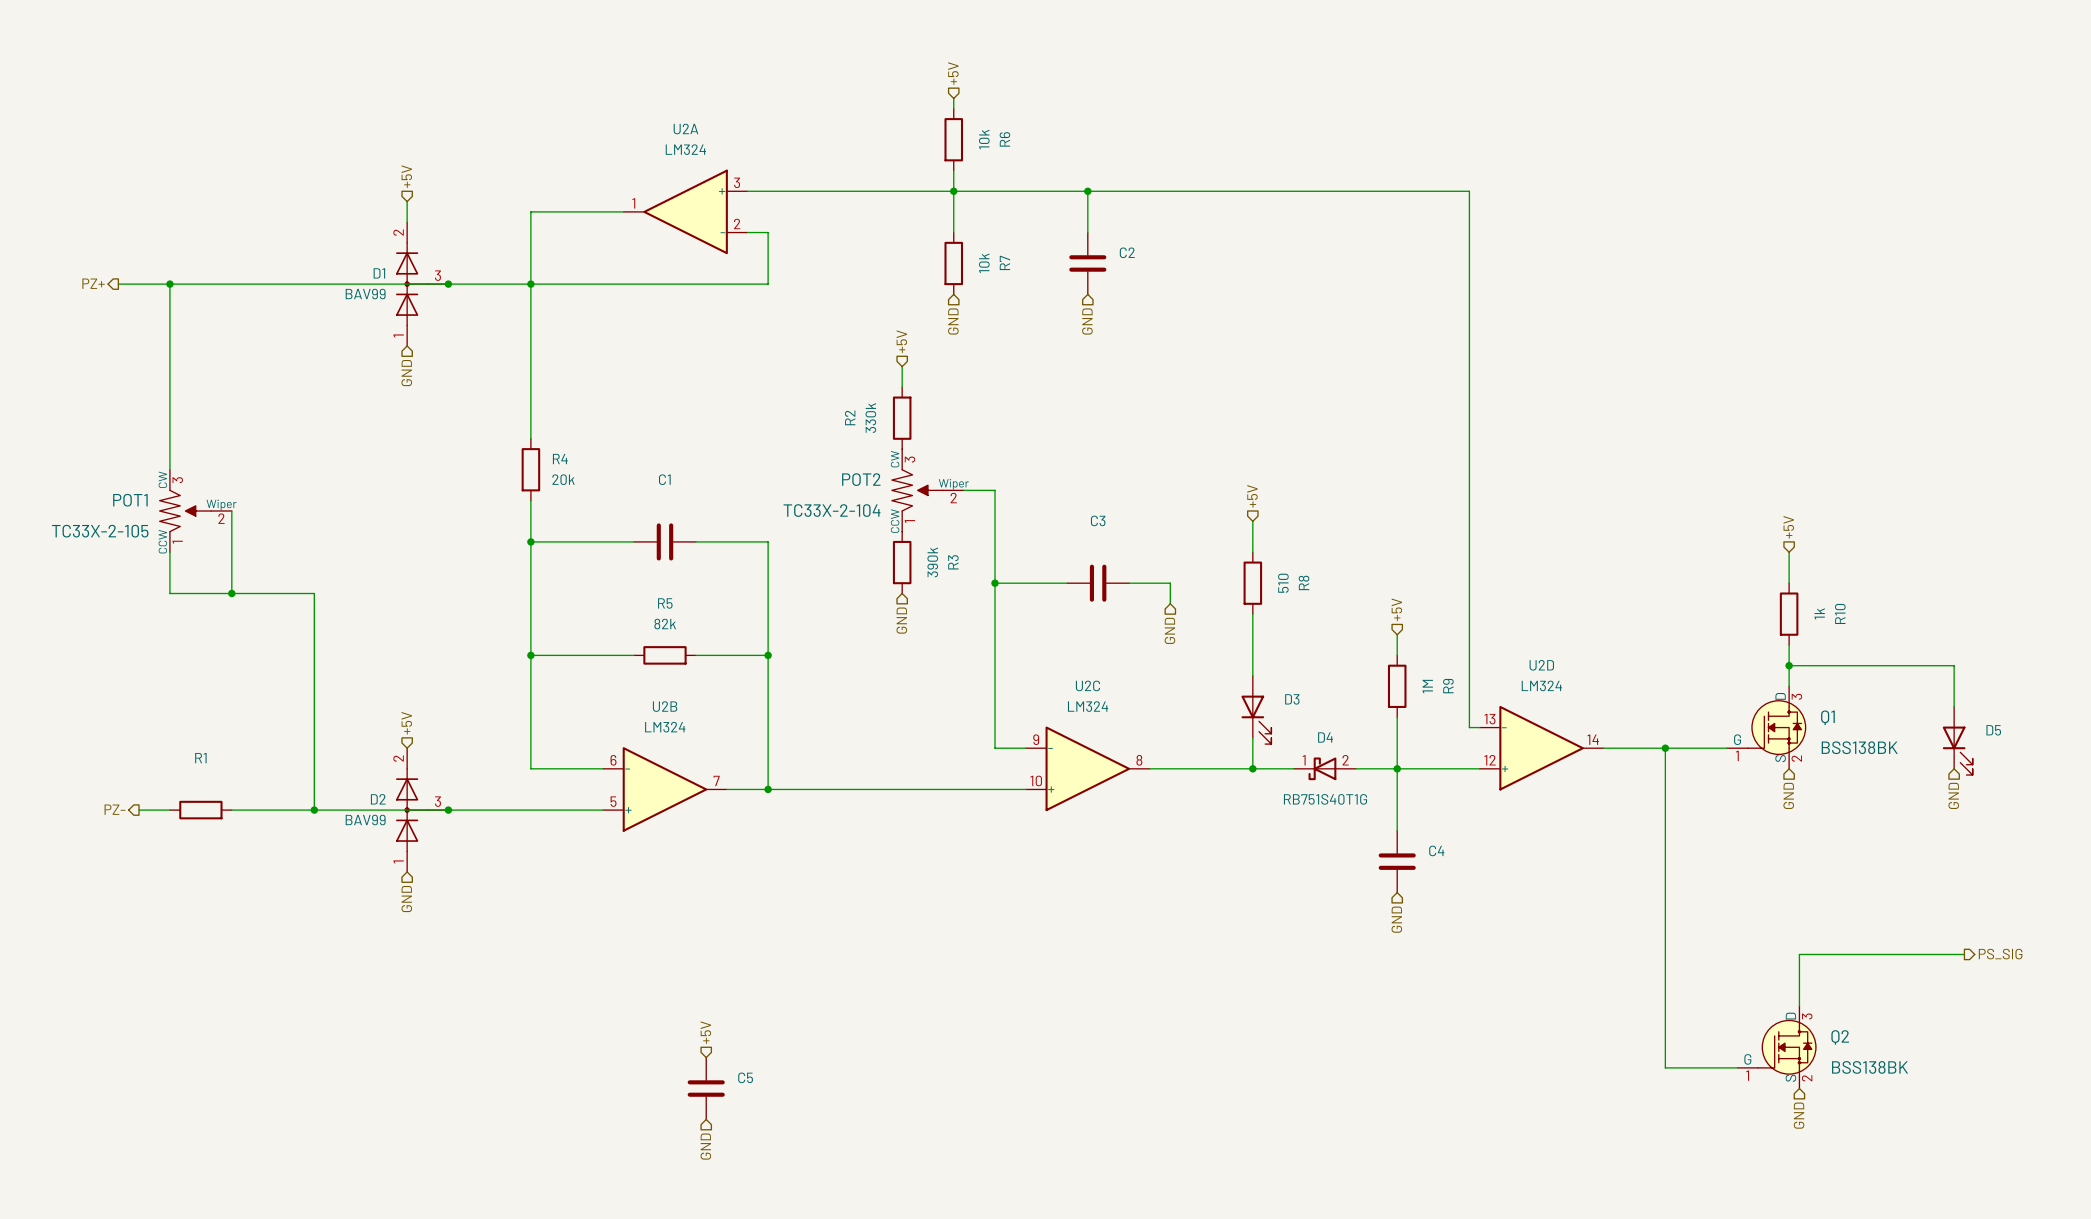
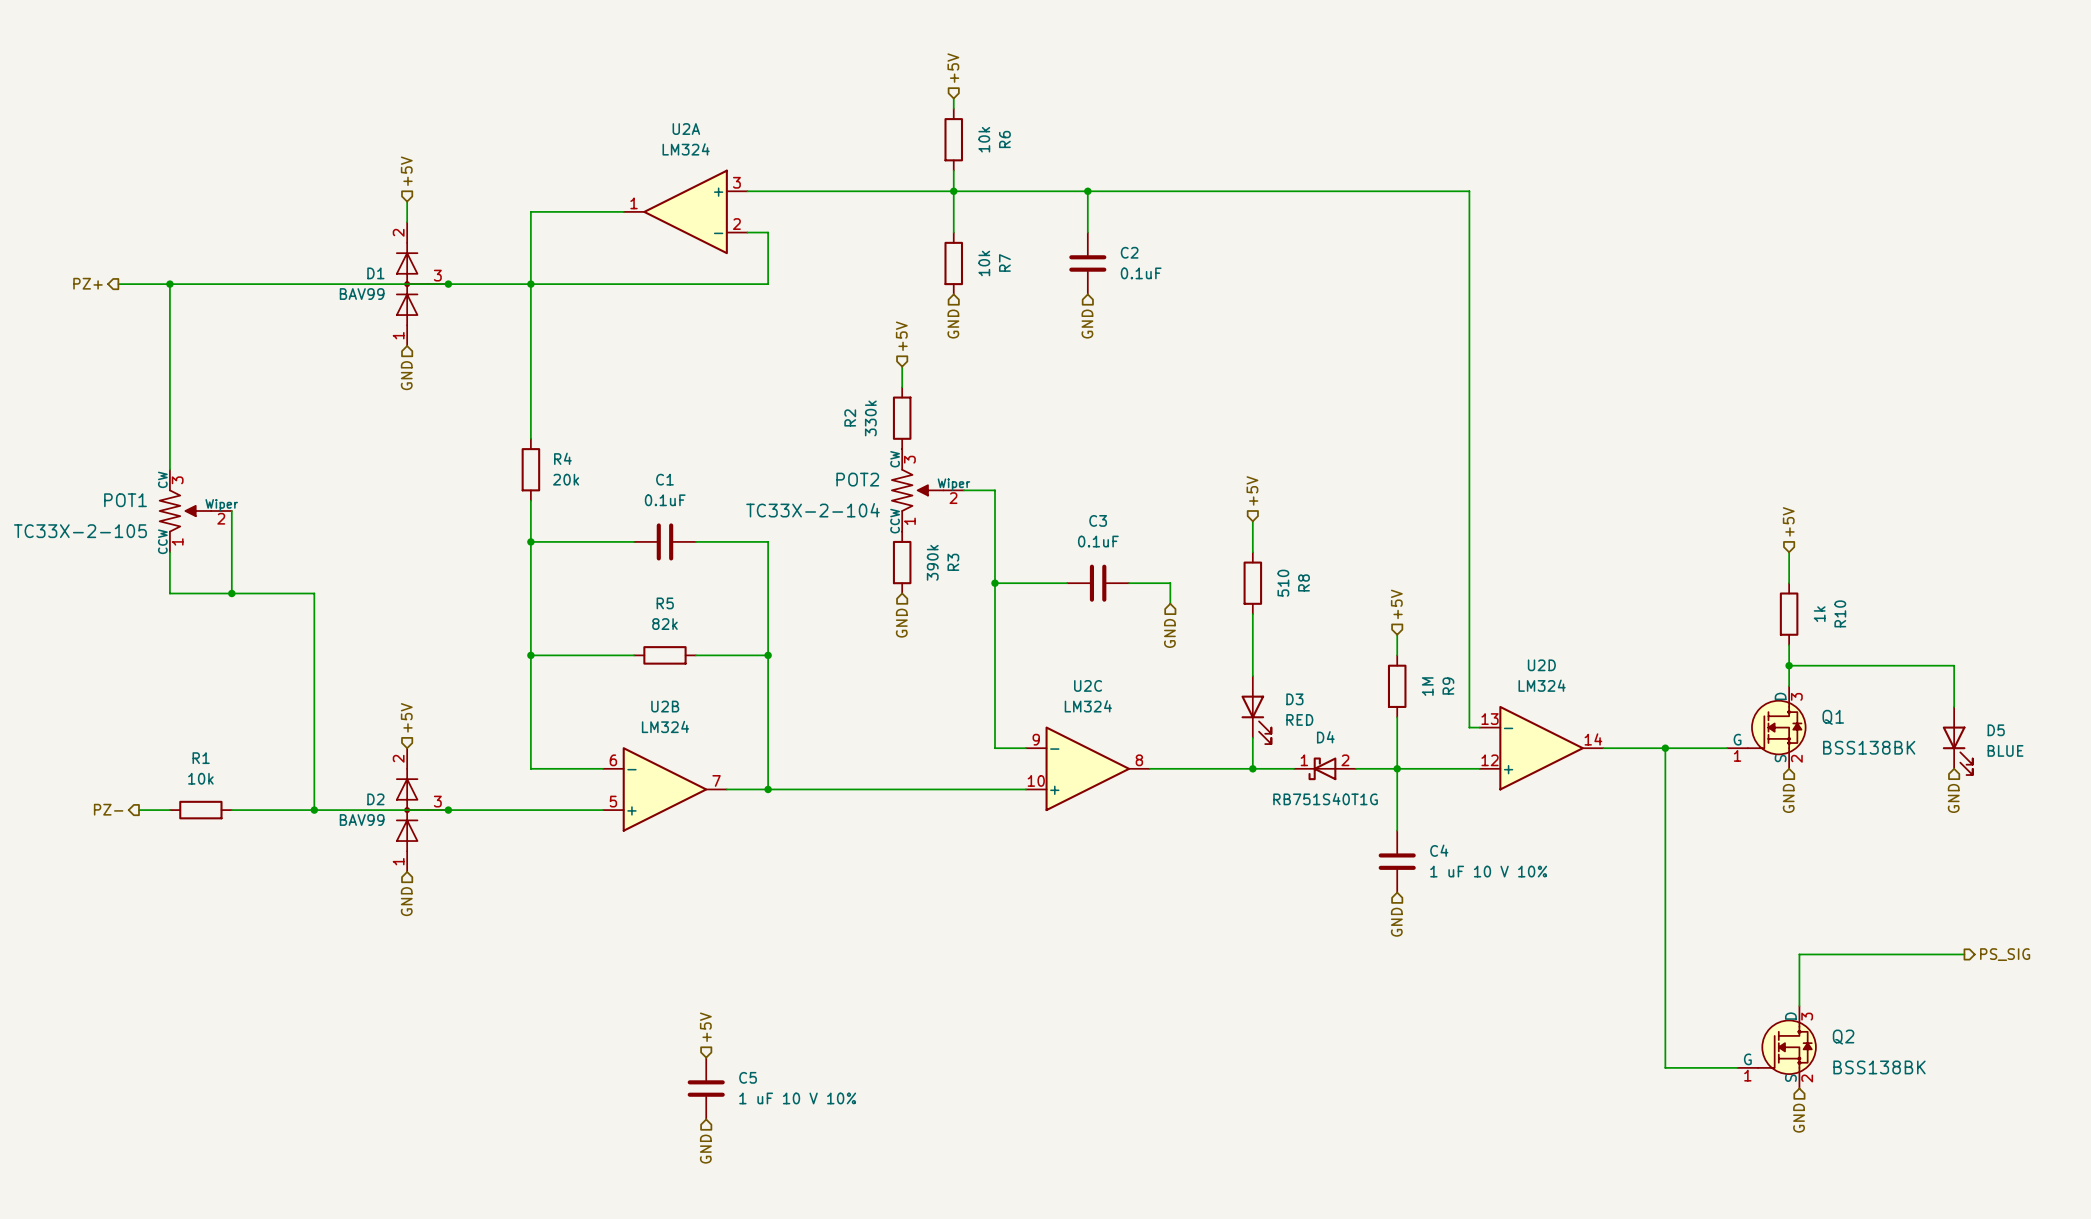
C2 value: none -> 0.1uF (1141, 273)
C1 value: none -> 0.1uF (665, 500)
C3 value: none -> 0.1uF (1098, 541)
D3 value: none -> RED (1299, 719)
D5 value: none -> BLUE (2005, 750)
R1 value: none -> 10k (200, 778)
C4 value: none -> 1 uF 10 V 10% (1488, 871)
C5 value: none -> 1 uF 10 V 10% (797, 1098)

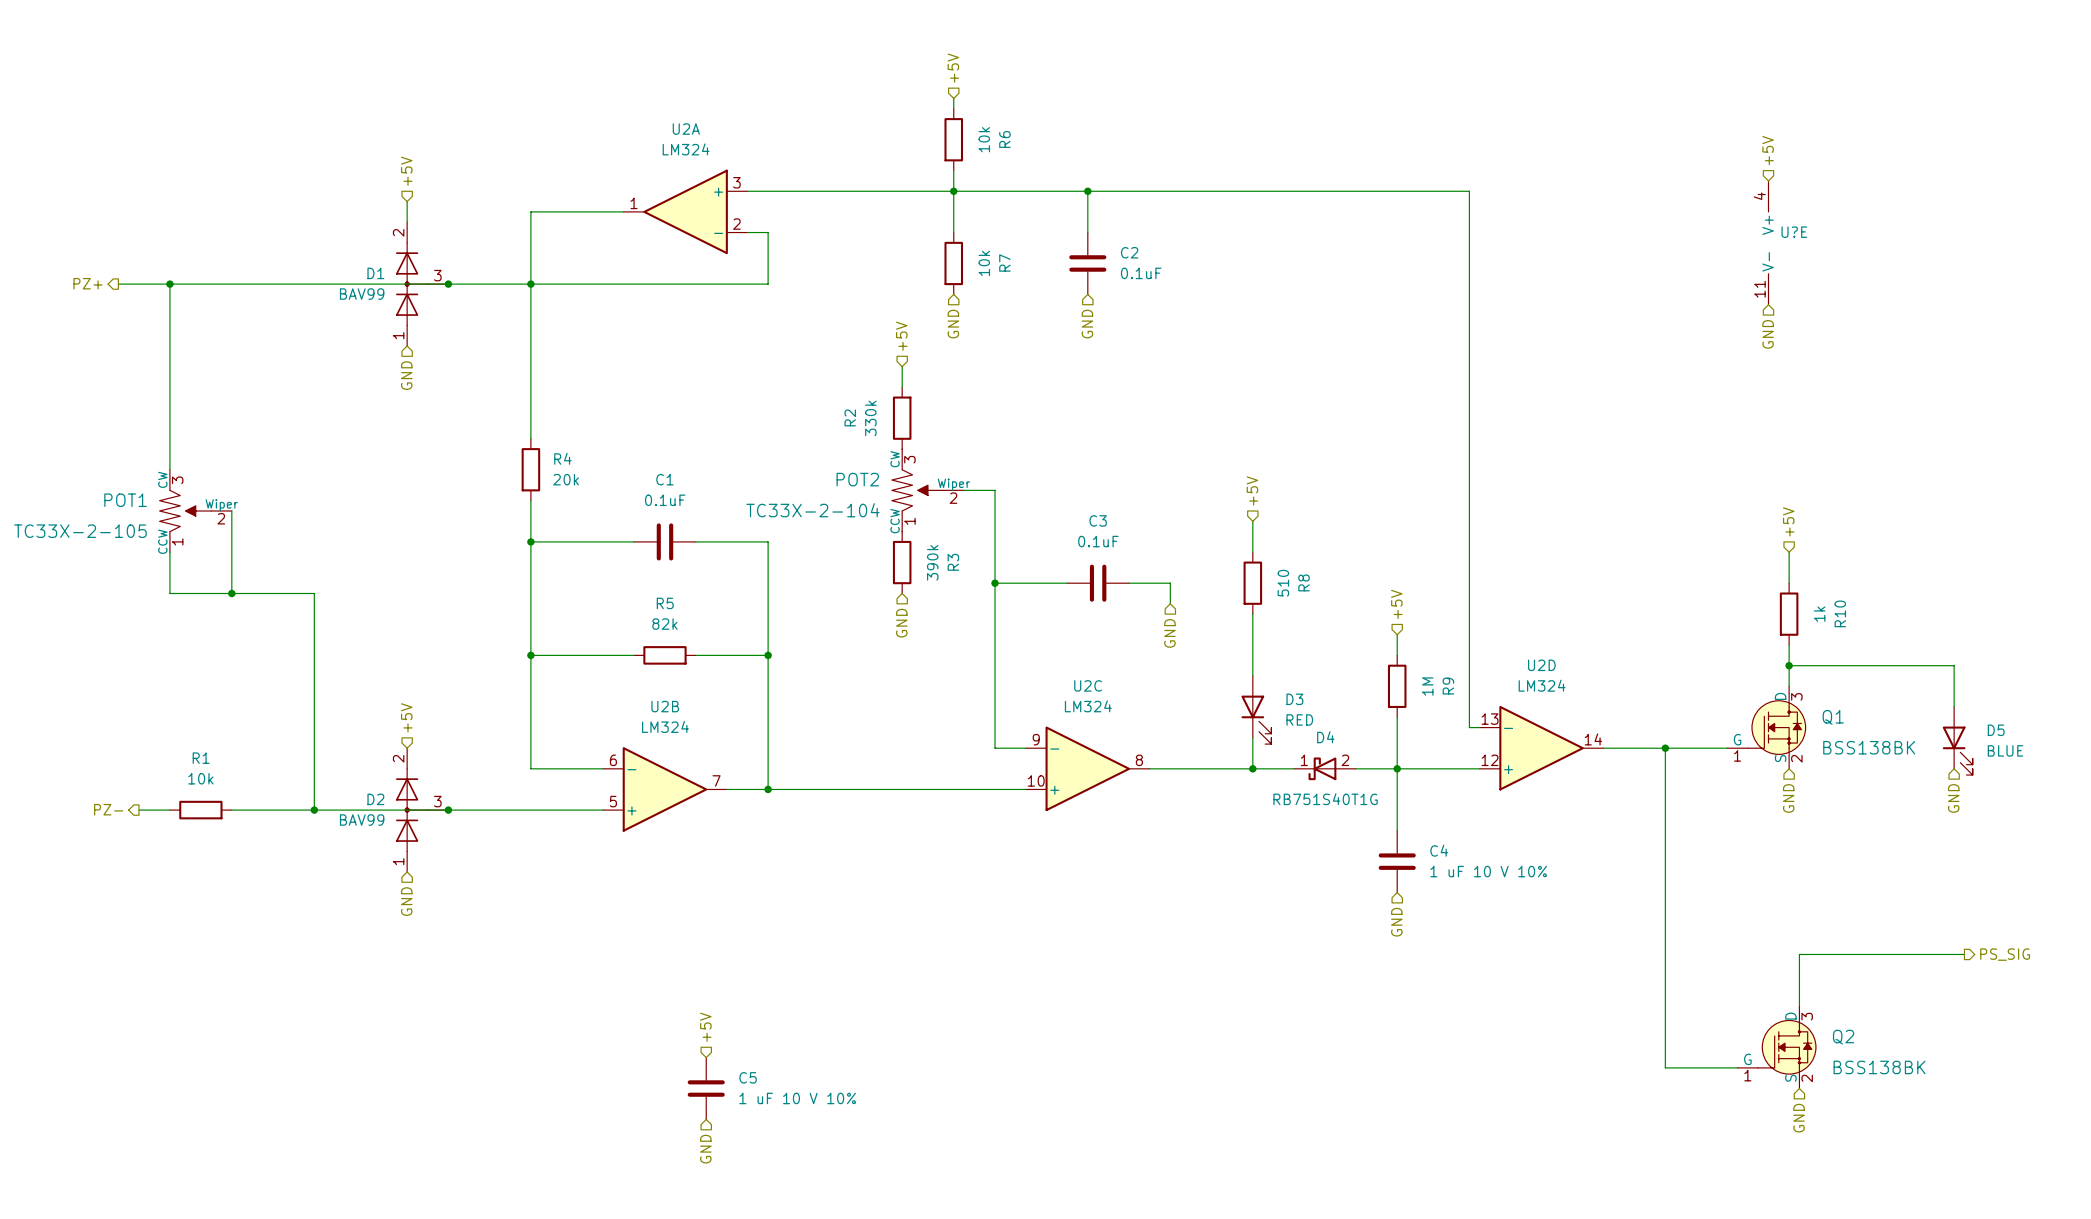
hierarchical label: none -> +5V (1768, 150)
U?E: none -> (1768, 242)
hierarchical label: none -> GND (1768, 334)

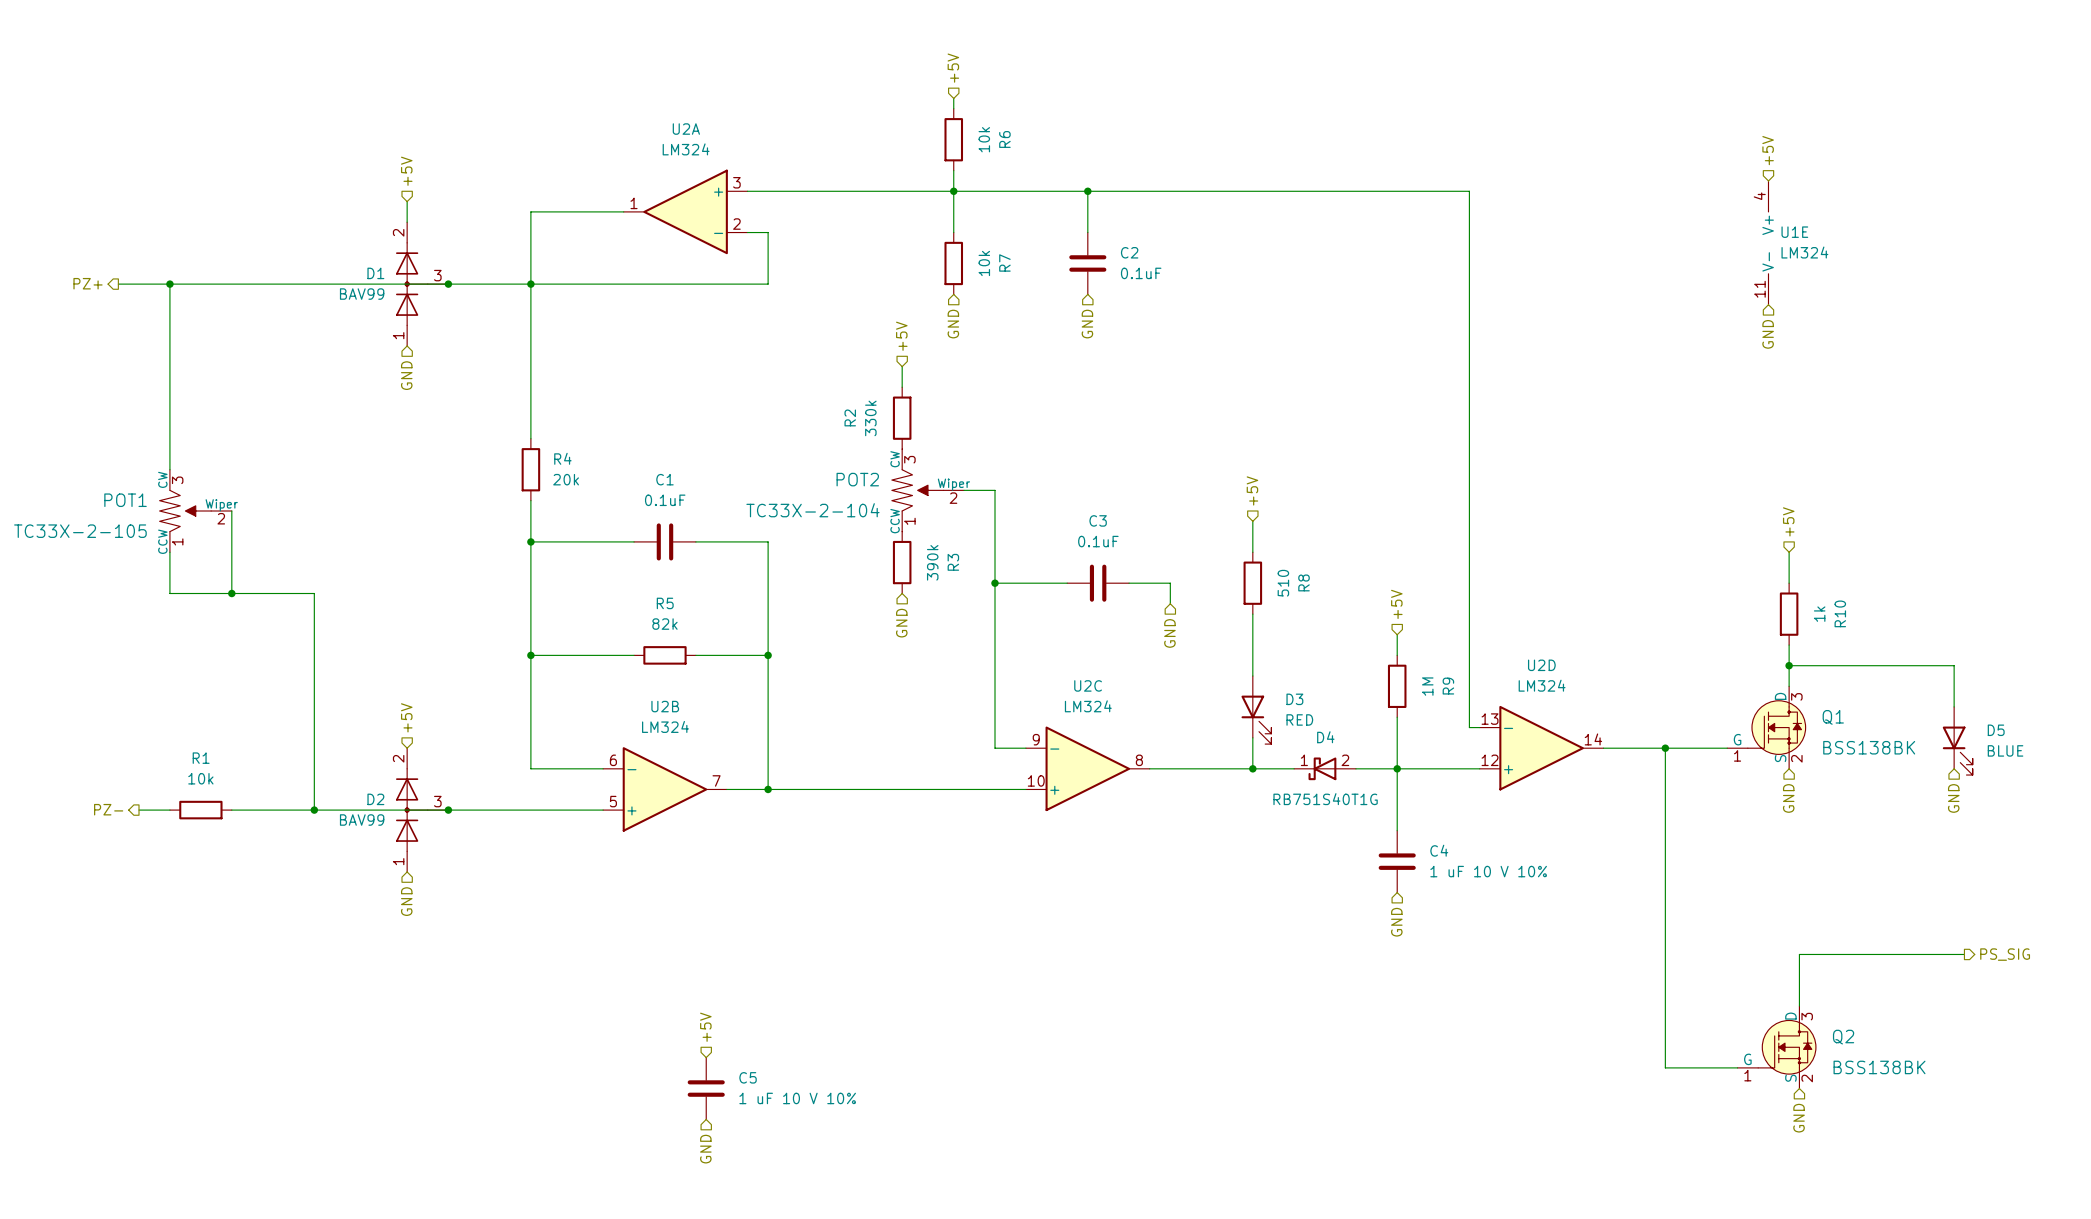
U?E name: U?E (1794, 232) -> U1E (1794, 232)
U?E value: none -> LM324 (1804, 252)

